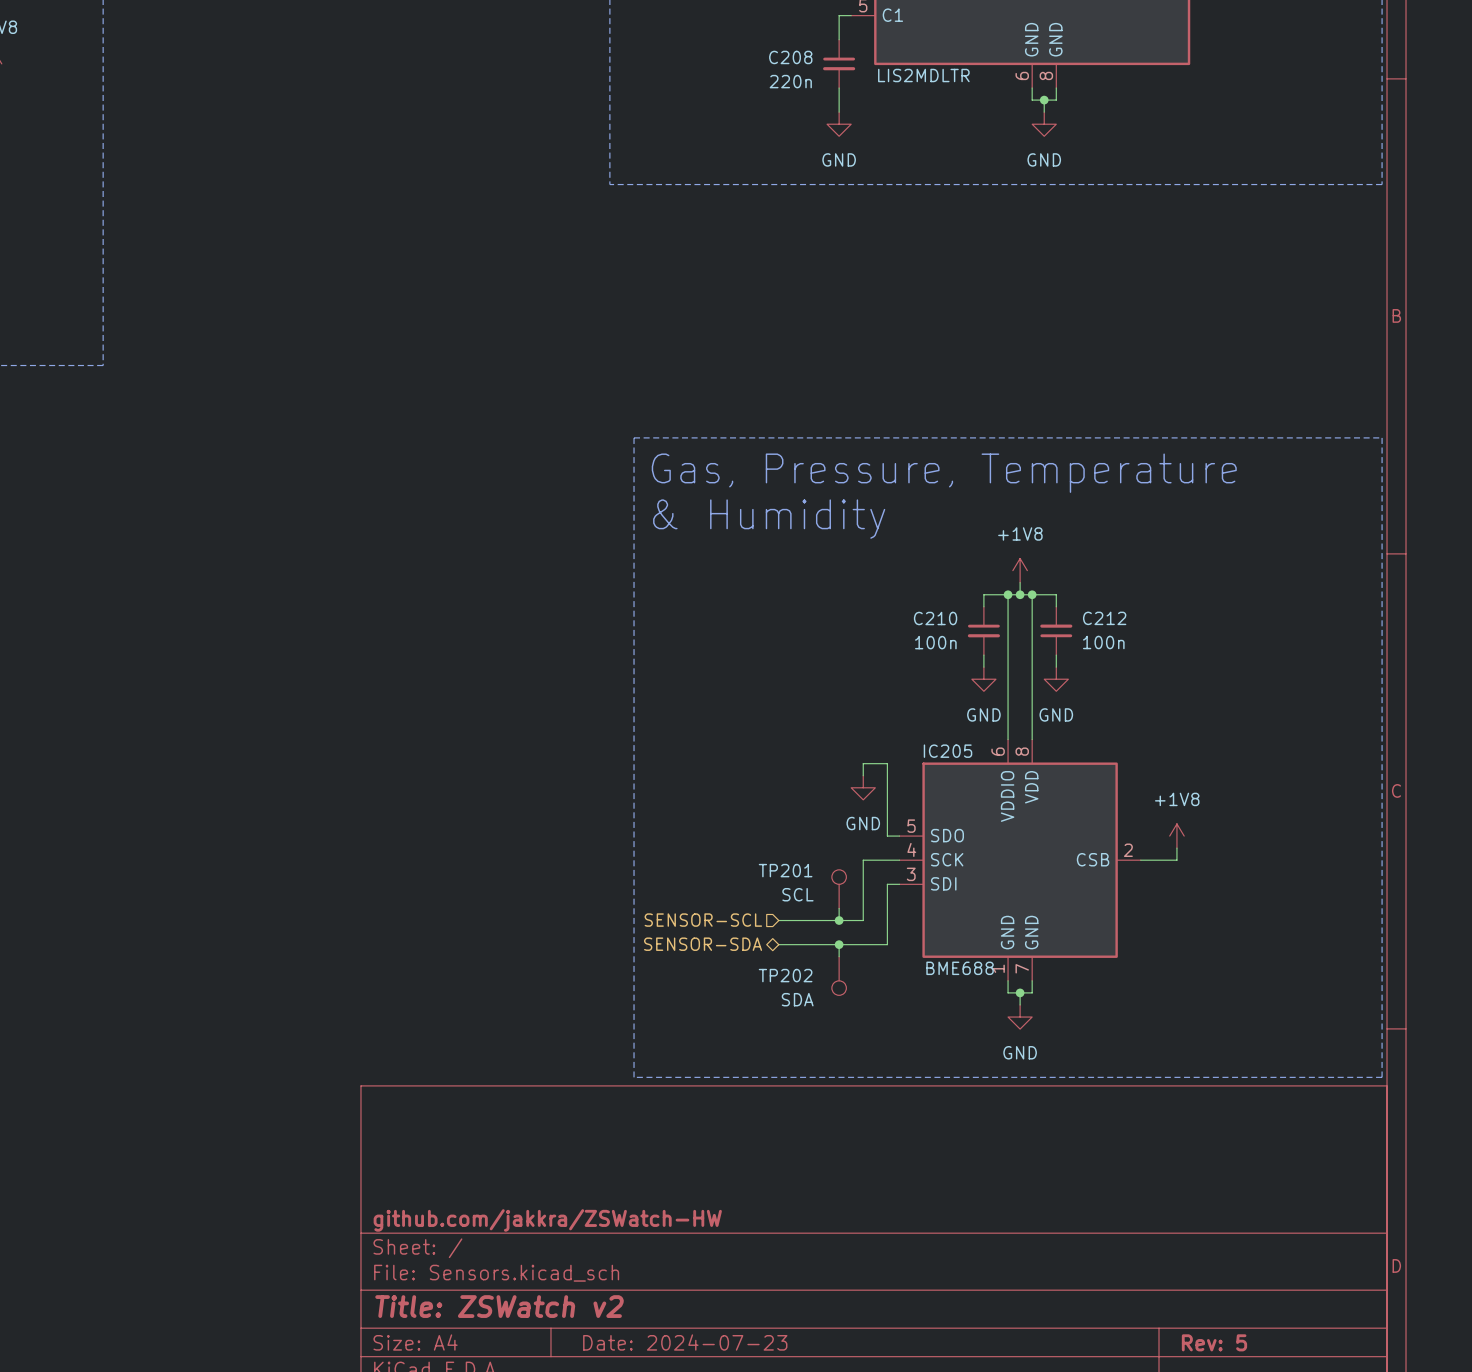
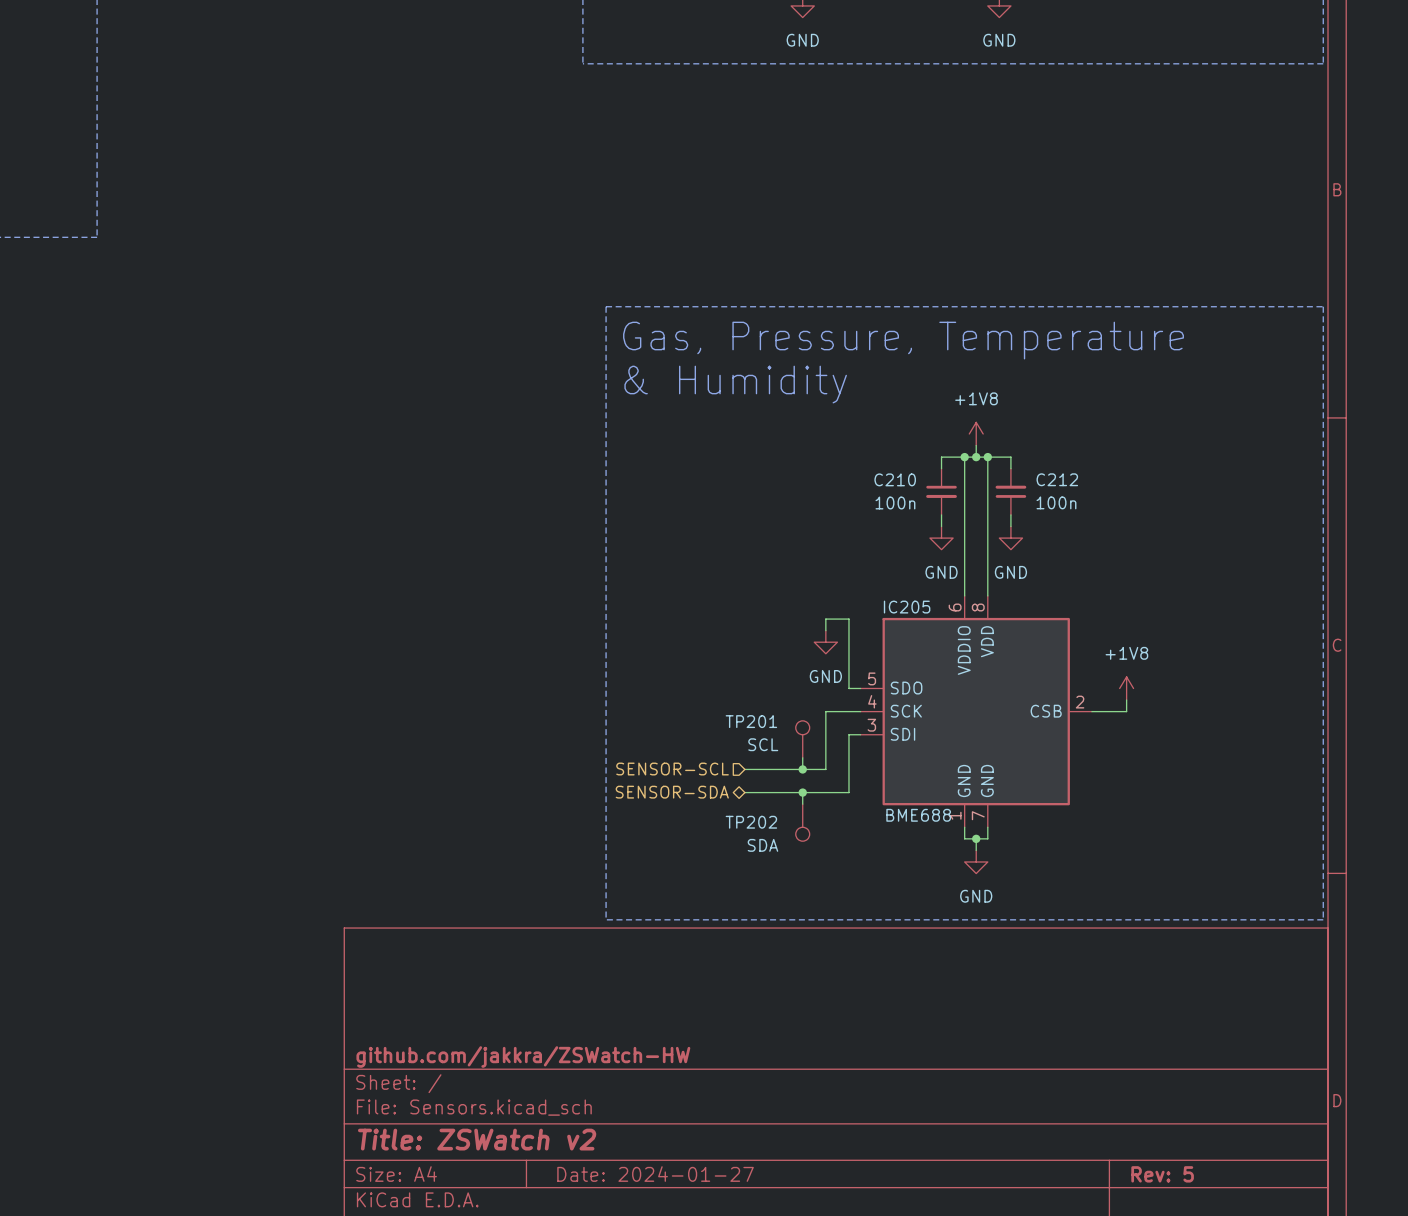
title block: Date: 2024-07-23 (685, 1342) -> Date: 2024-01-27 (655, 1174)

